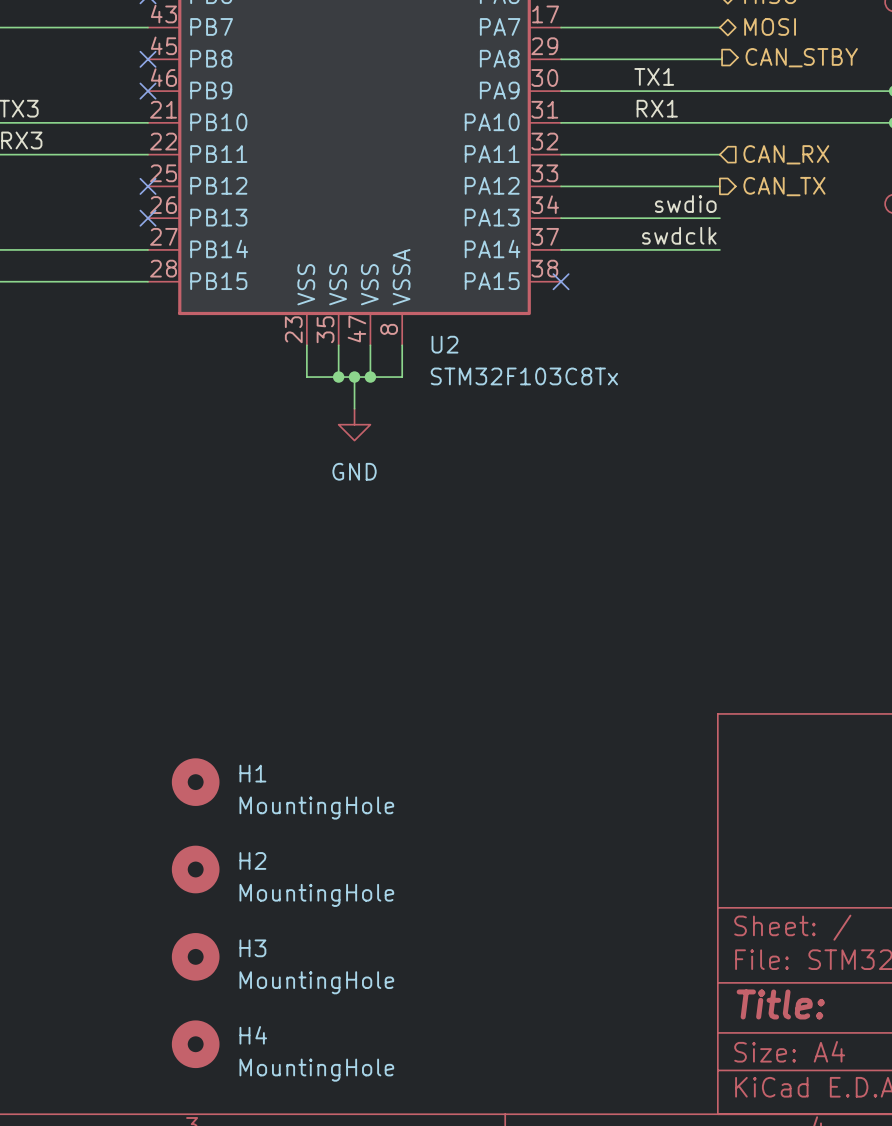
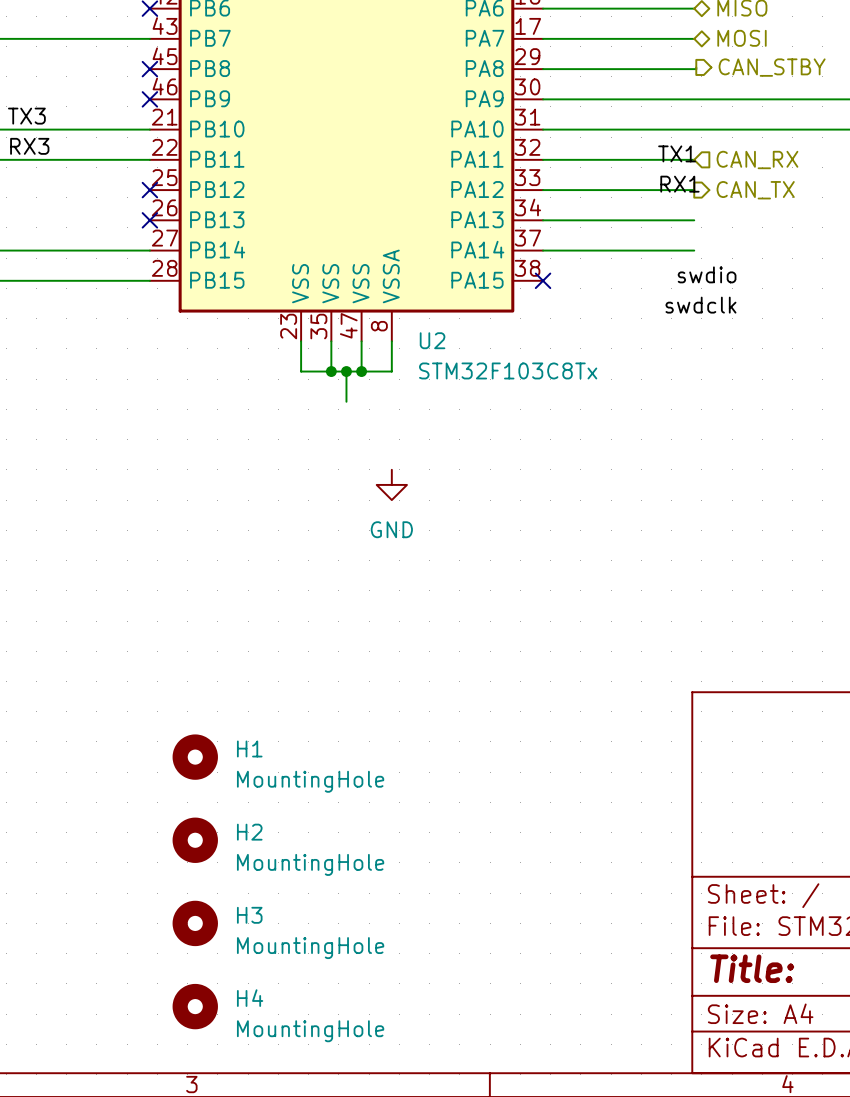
label position: TX1 (654, 76) -> TX1 (677, 153)
label position: RX1 (657, 108) -> RX1 (679, 184)
label position: swdio (685, 204) -> swdio (707, 274)
label position: swdclk (679, 235) -> swdclk (700, 305)
power symbol position: GND (354, 424) -> GND (391, 484)

